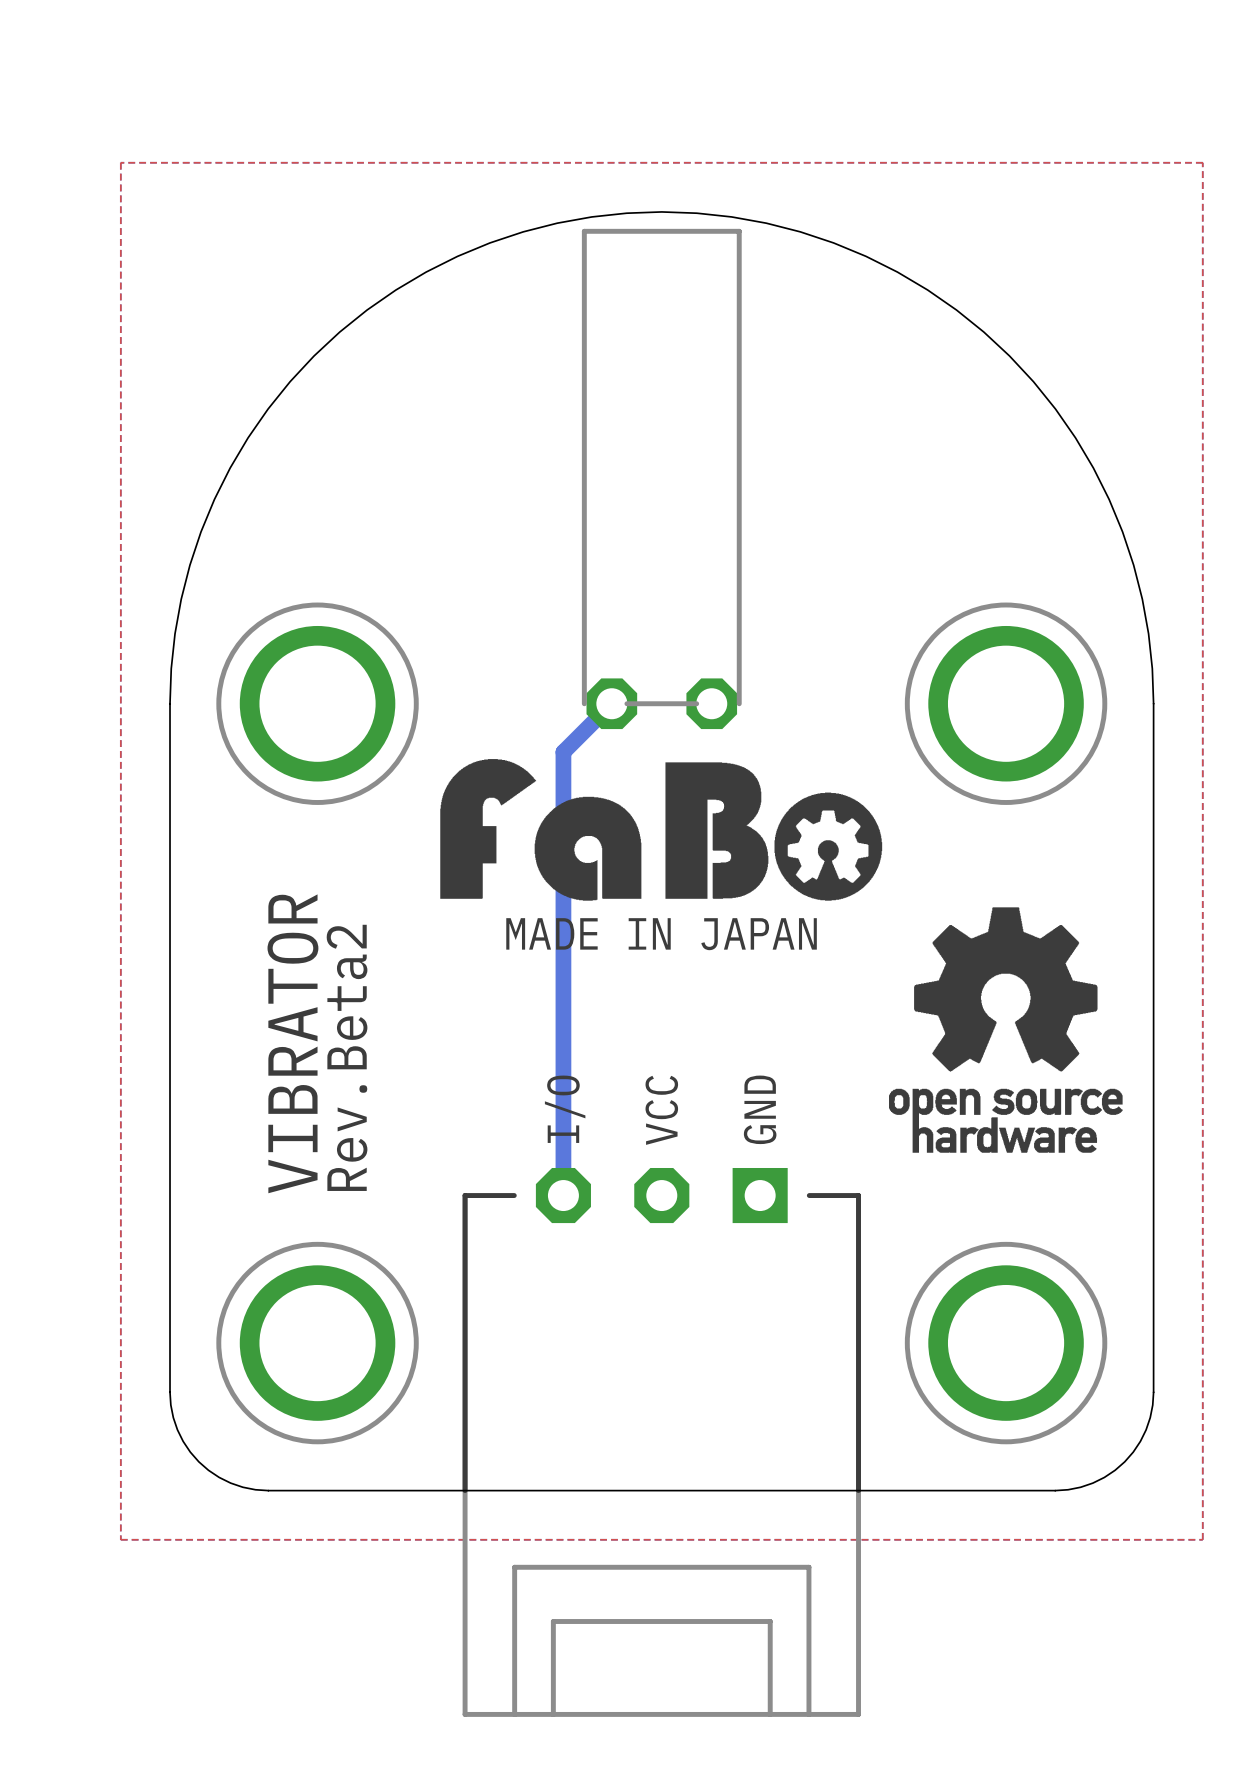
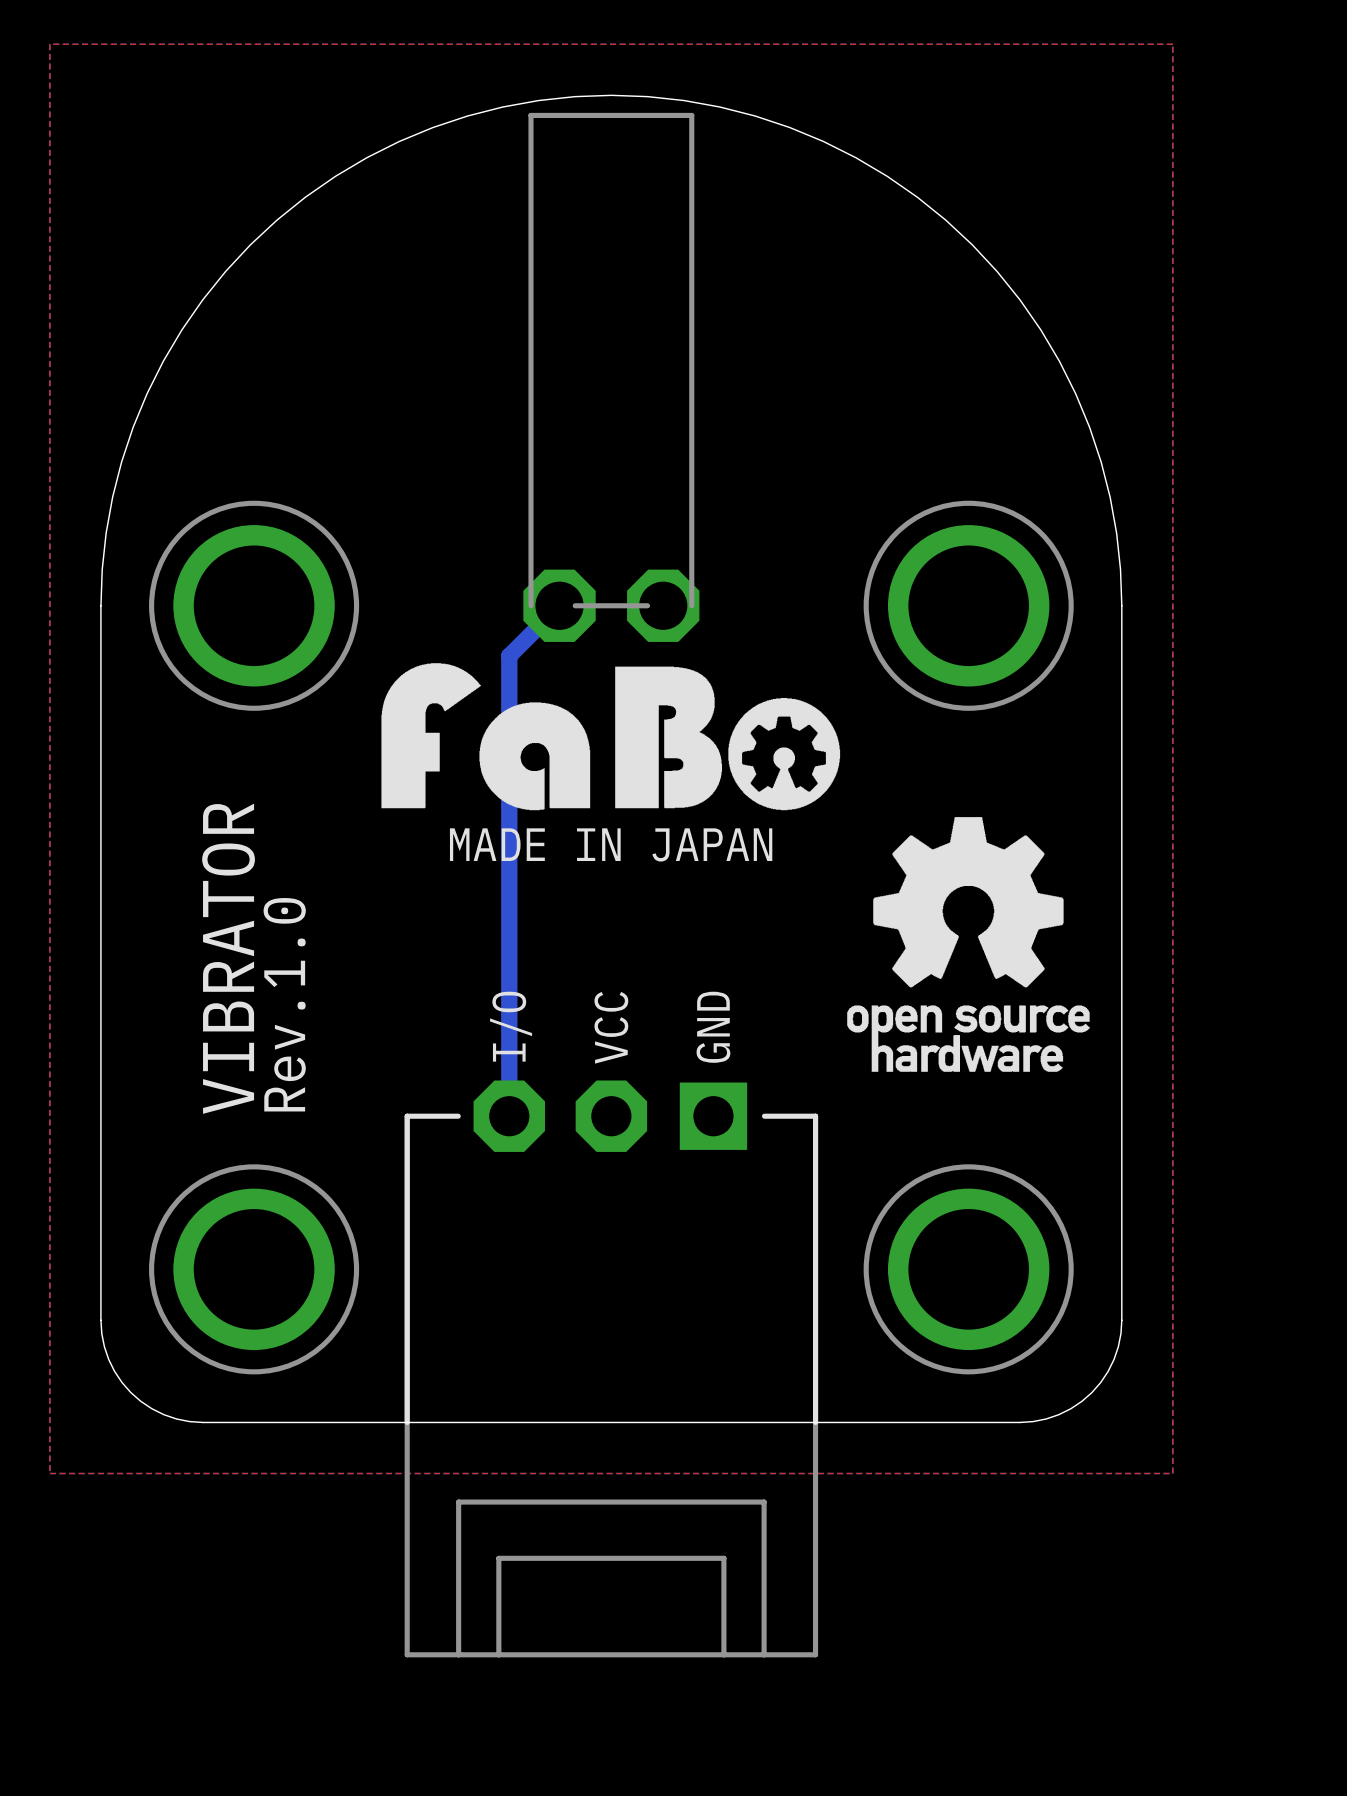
part footprint: [170, 211, 1154, 1717] -> [100, 95, 1122, 1658]
part footprint: [581, 228, 742, 730] -> [523, 112, 700, 642]
text: Rev.Beta2 (347, 1057) -> Rev.1.0 (284, 1004)

